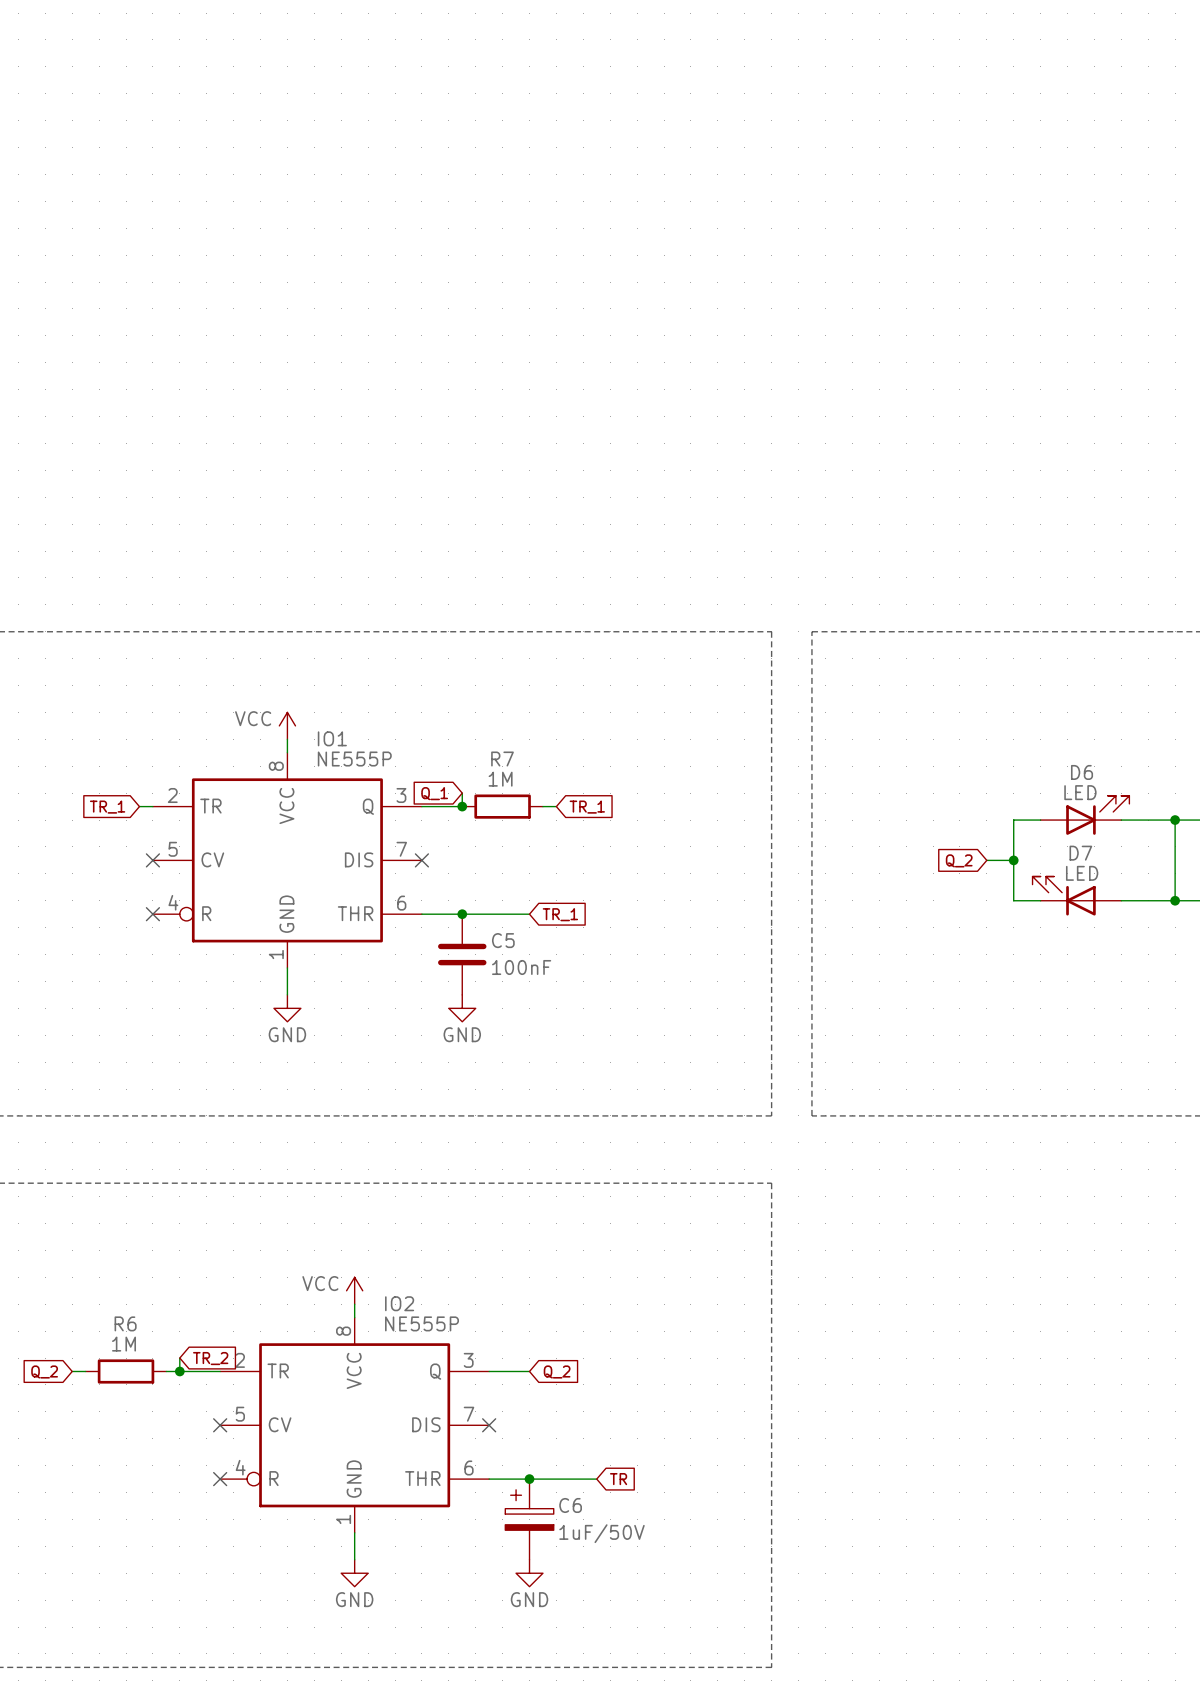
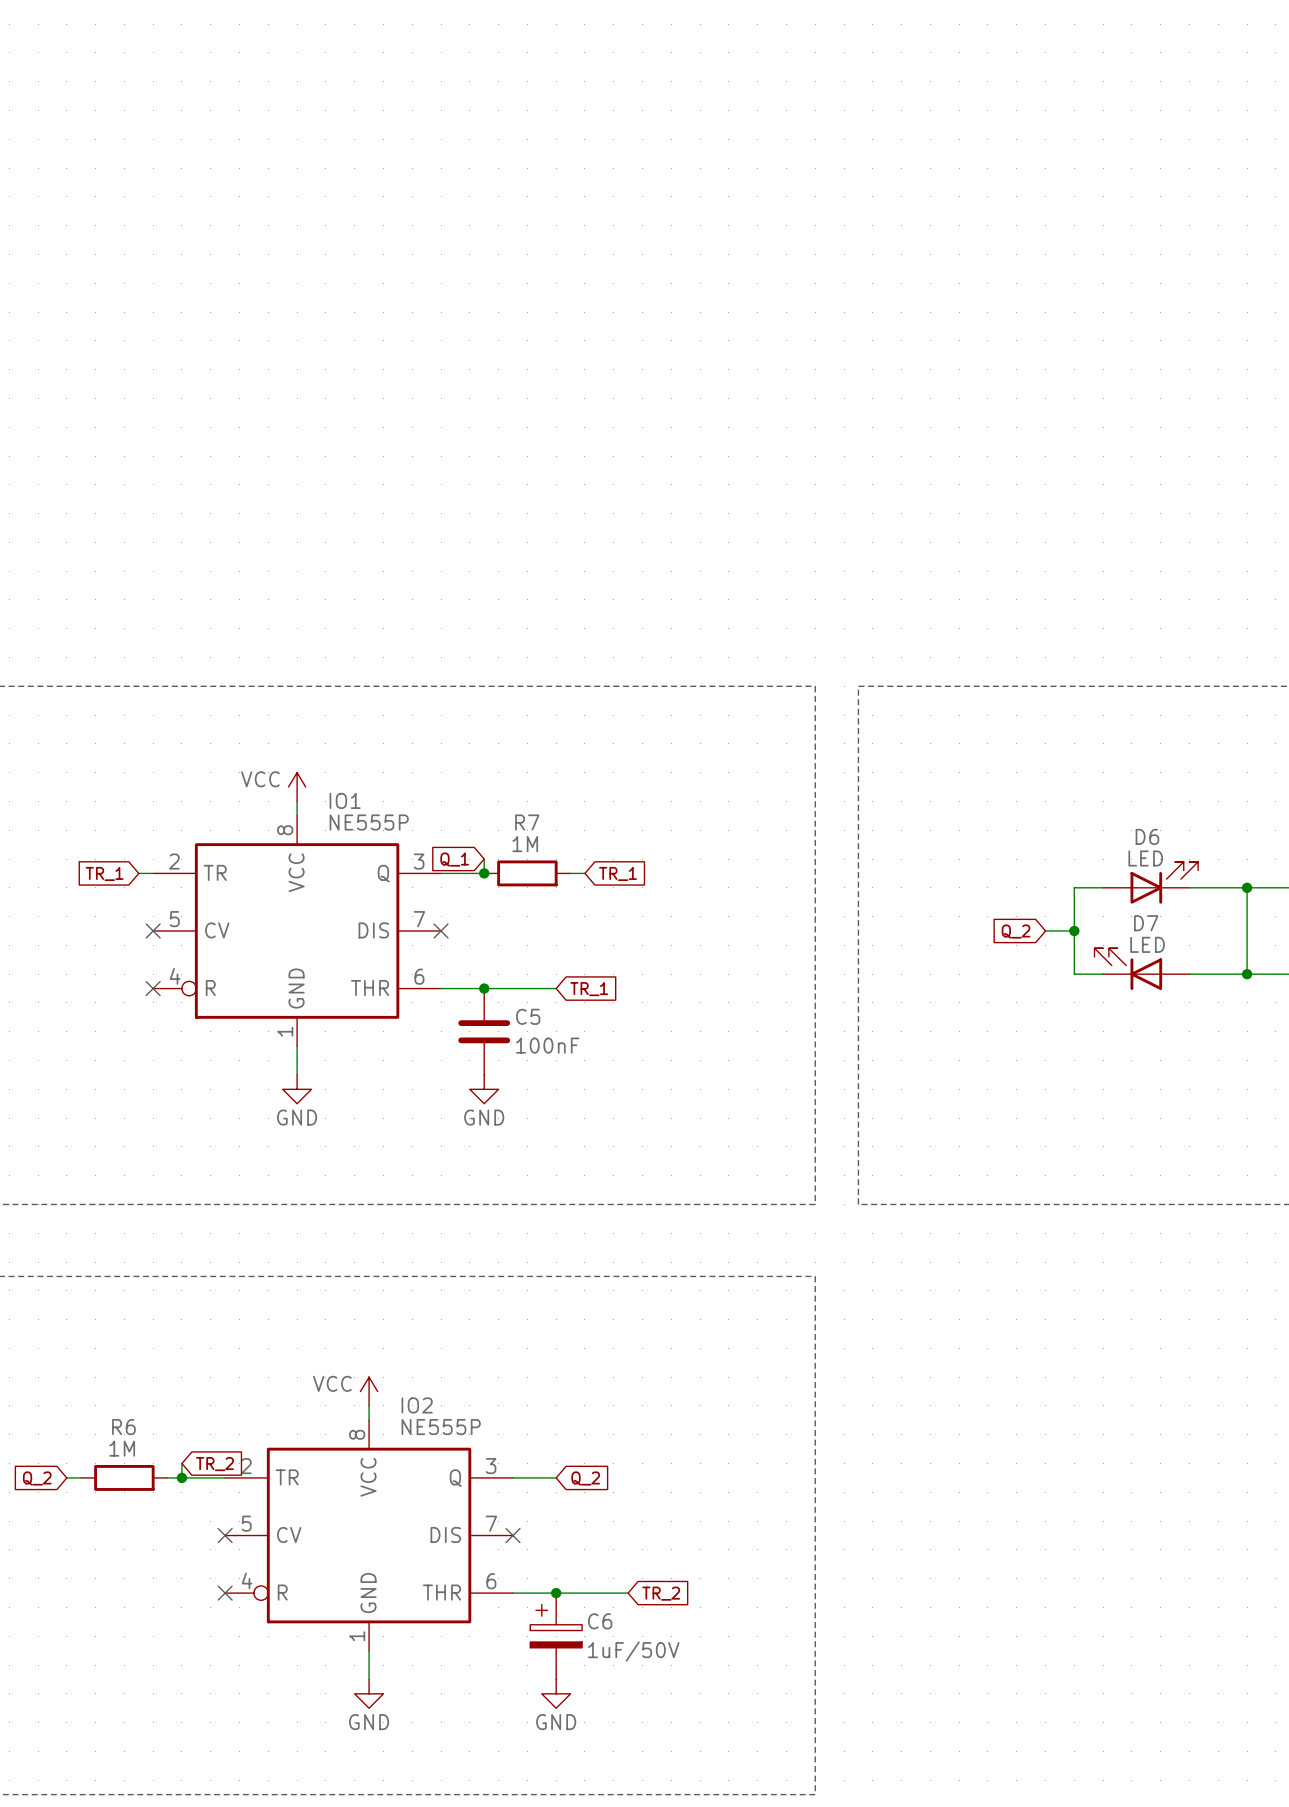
global label: TR (618, 1479) -> TR_2 (661, 1593)

